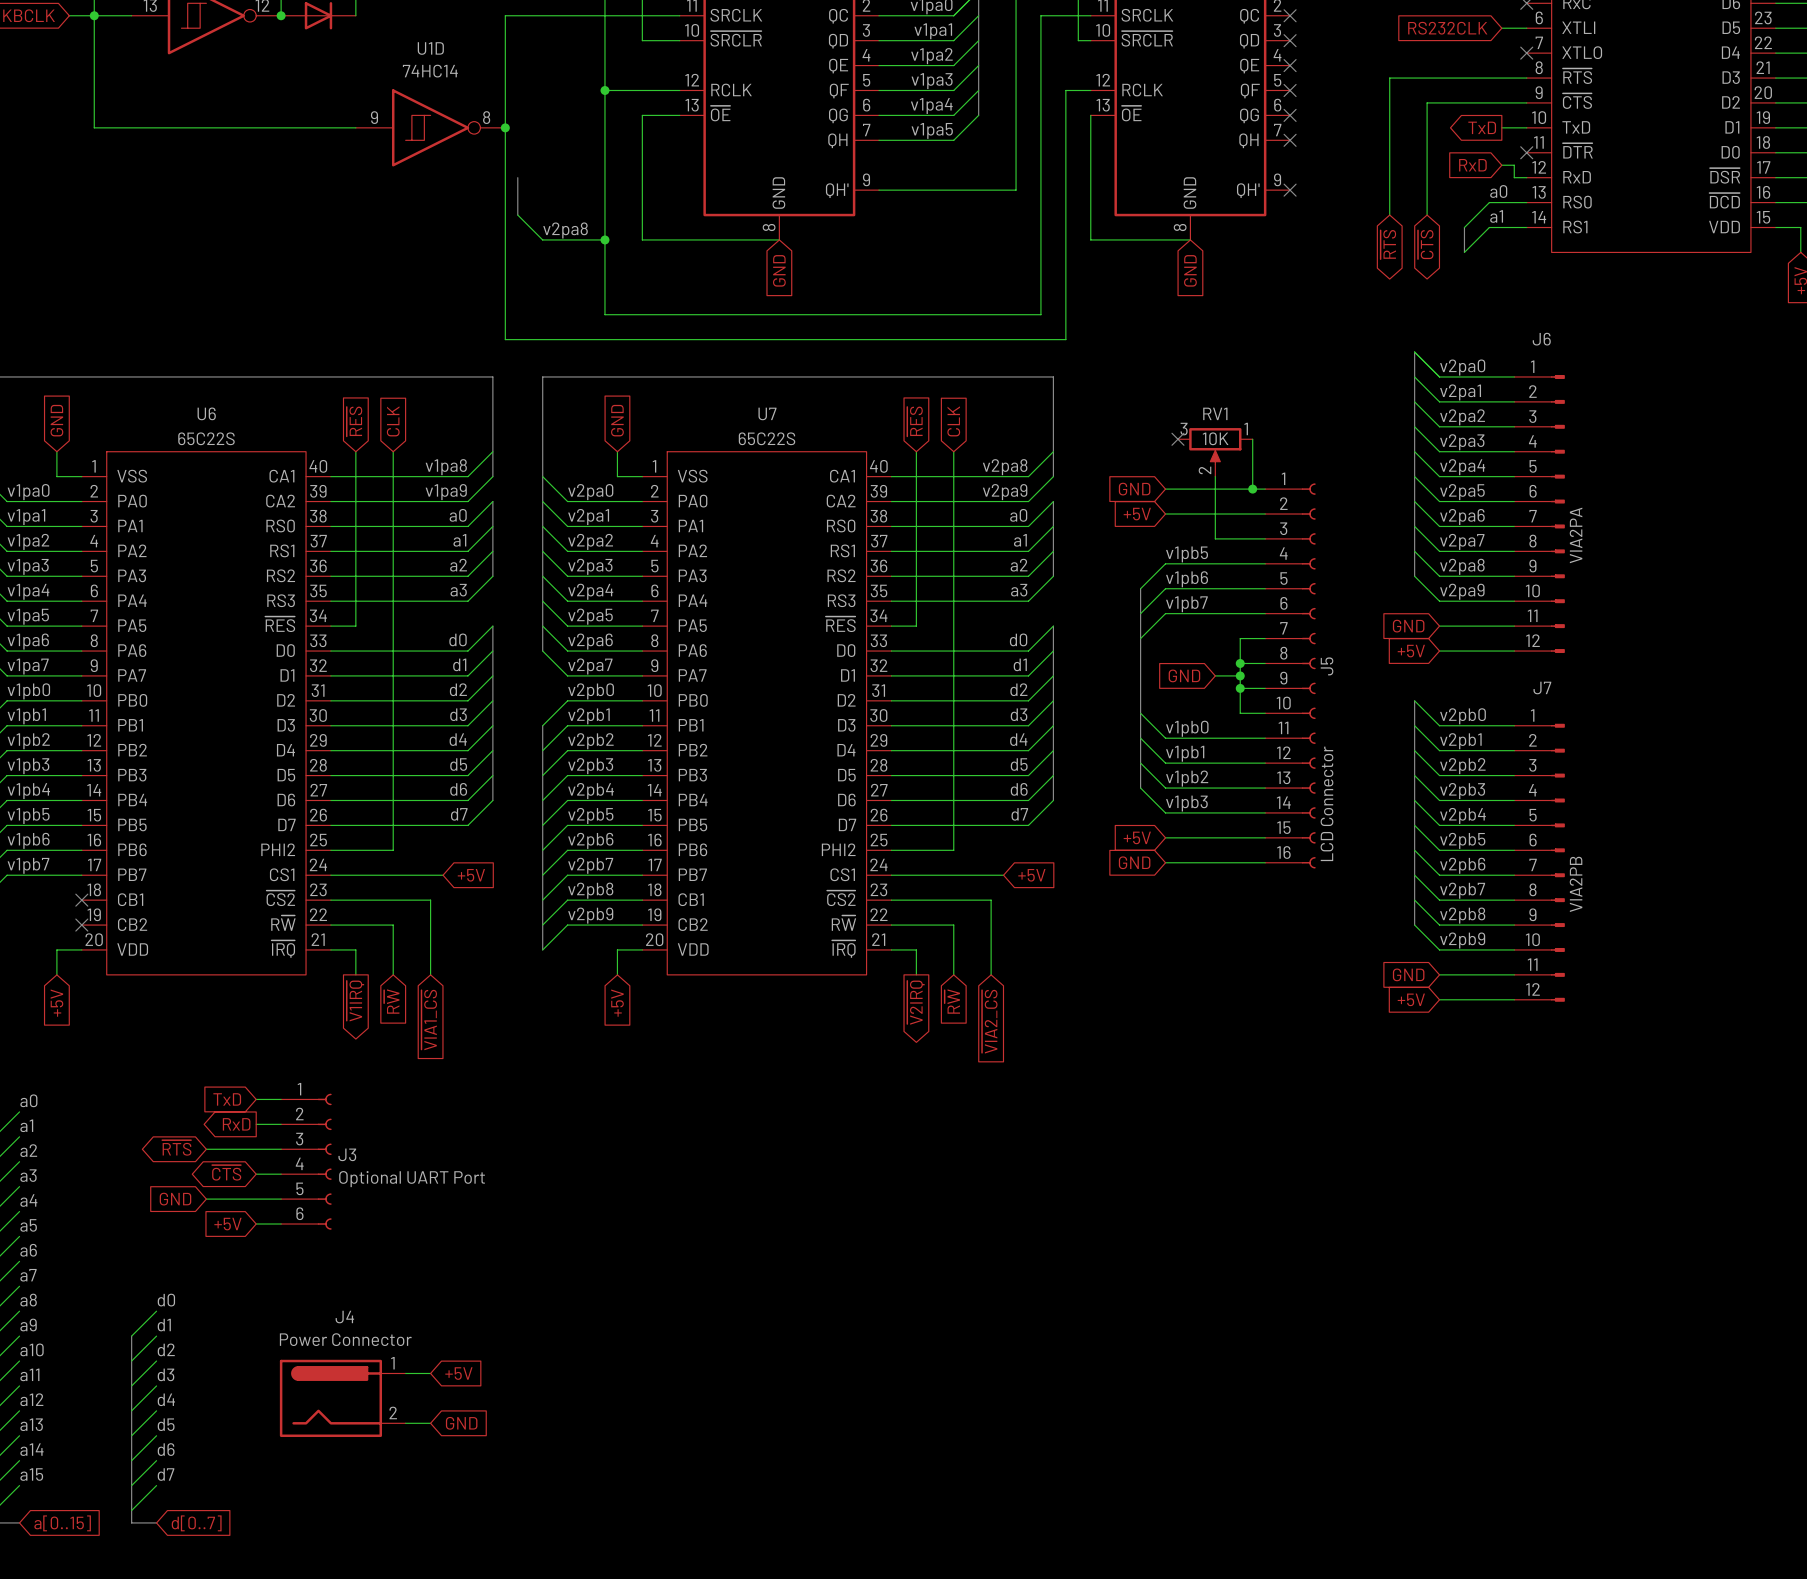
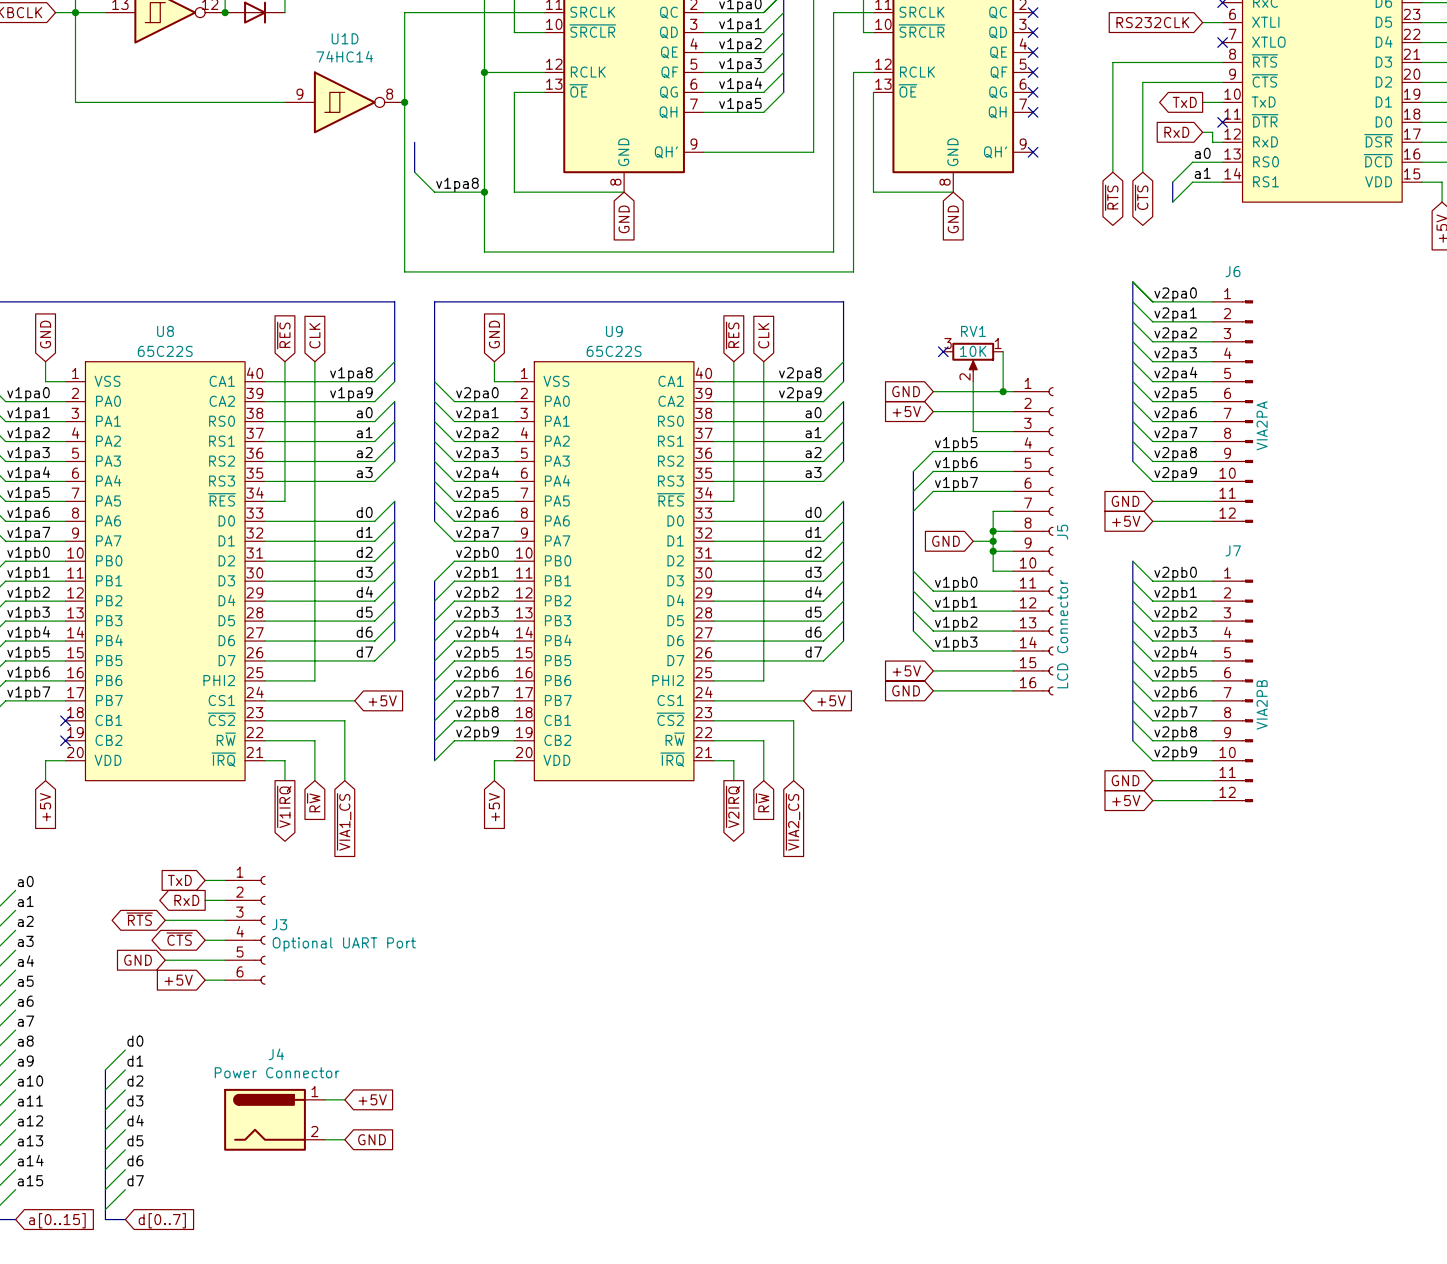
label: v2pa8 (565, 230) -> v1pa8 (457, 184)
U6 name: U6 (206, 413) -> U8 (165, 331)
U7 name: U7 (767, 413) -> U9 (614, 331)

